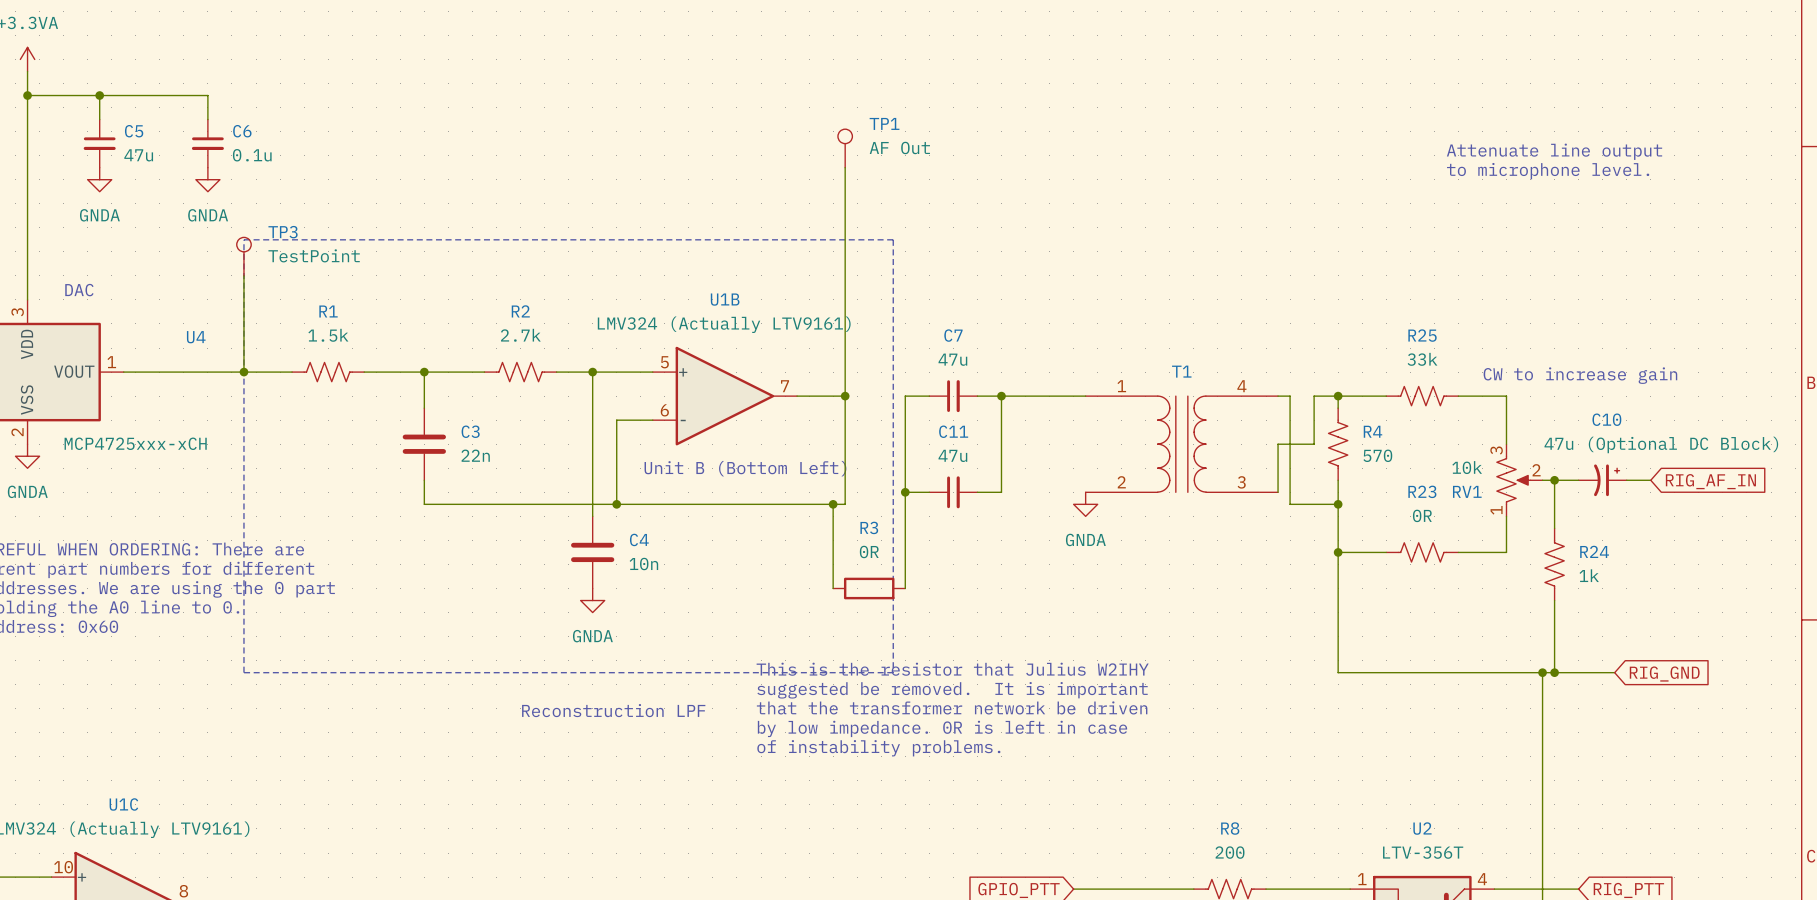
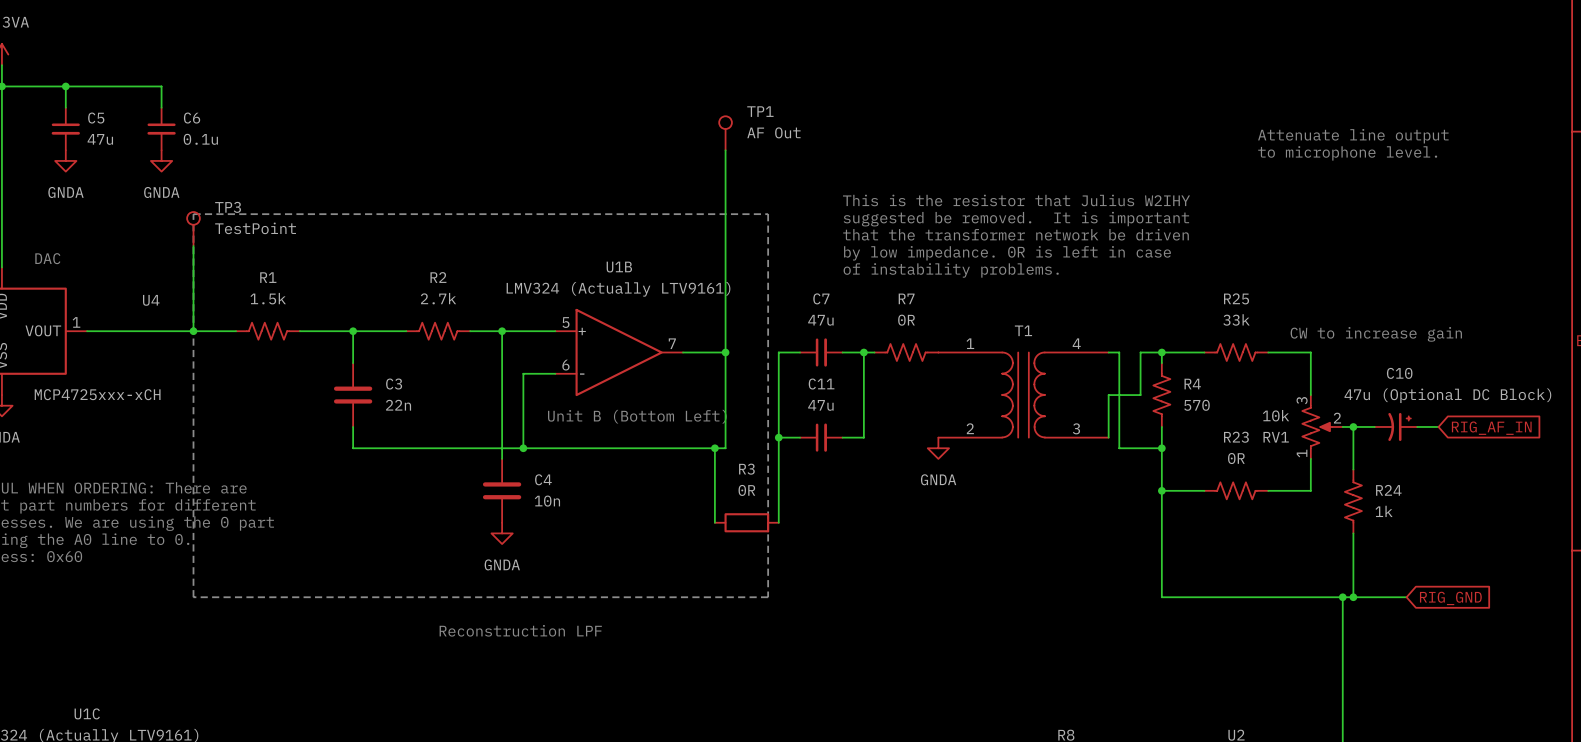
text: none -> This is the resistor that Julius W2IHY (1016, 200)
text: none -> suggested be removed. It is important (1016, 219)
text: none -> that the transformer network be driven (1016, 234)
text: none -> by low impedance. 0R is left in case (1007, 253)
text: none -> of instability problems. (951, 270)
R7: none -> 0R (906, 352)
text: This is the resistor that Julius W2IHY (952, 669) -> none
text: suggested be removed. It is important (952, 690) -> none
text: that the transformer network be driven (952, 707) -> none
text: by low impedance. 0R is left in case (942, 728) -> none
text: of instability problems. (878, 748) -> none

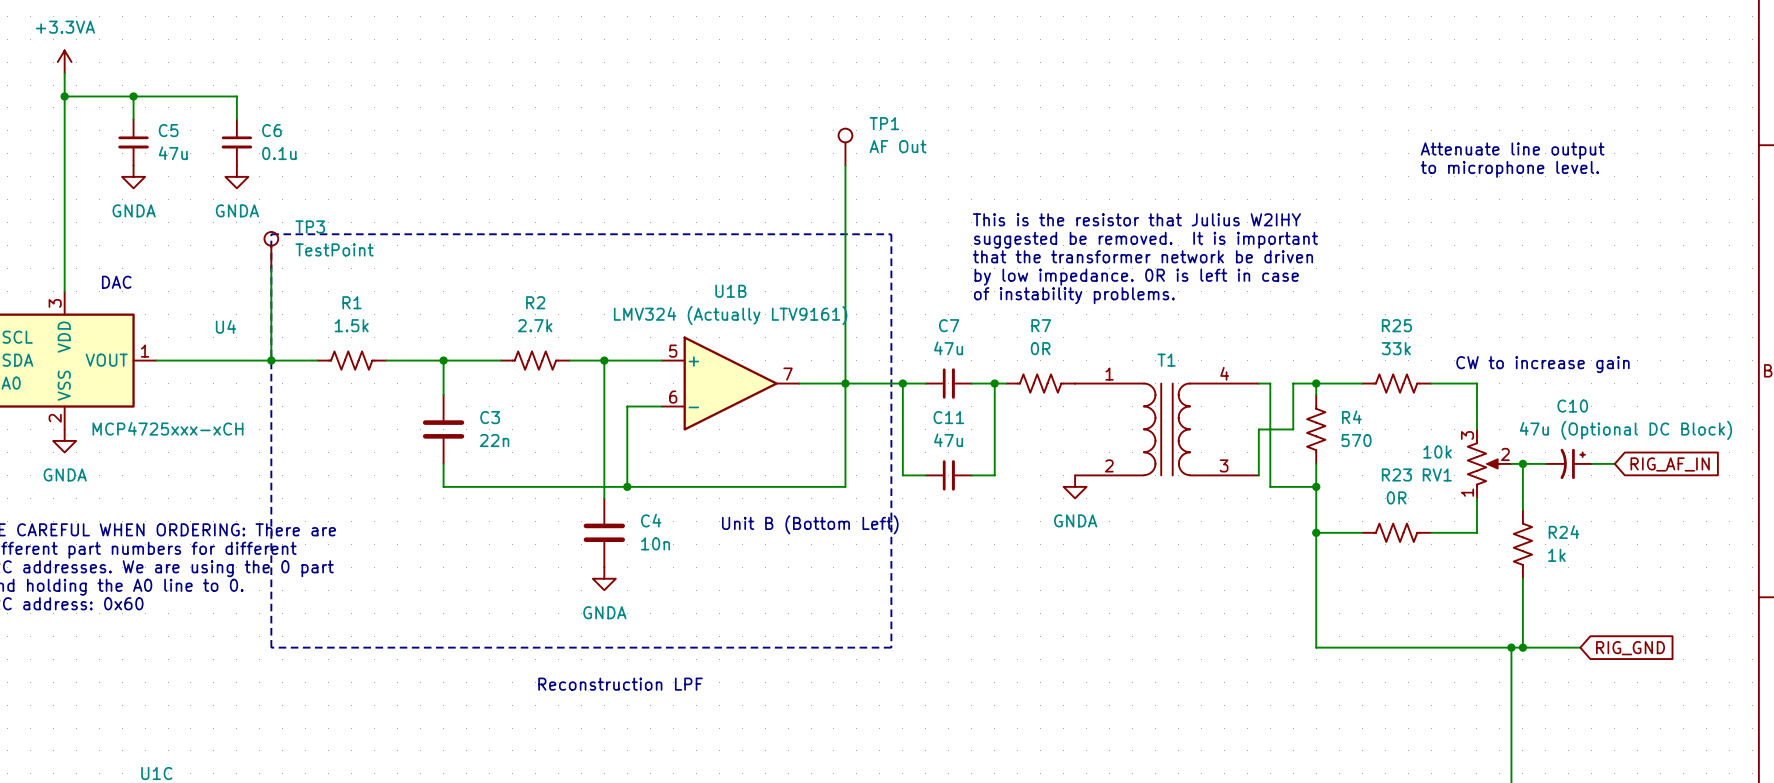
wire: none -> (845, 383) (902, 383)
junction: none -> (902, 383)
text position: Unit B (Bottom Left) (637, 416) -> Unit B (Bottom Left) (810, 524)
wire: (778, 437) (778, 522) -> none
junction: (778, 437) -> none
wire: (714, 448) (714, 522) -> none
junction: (714, 448) -> none
R3: 0R (746, 522) -> none

